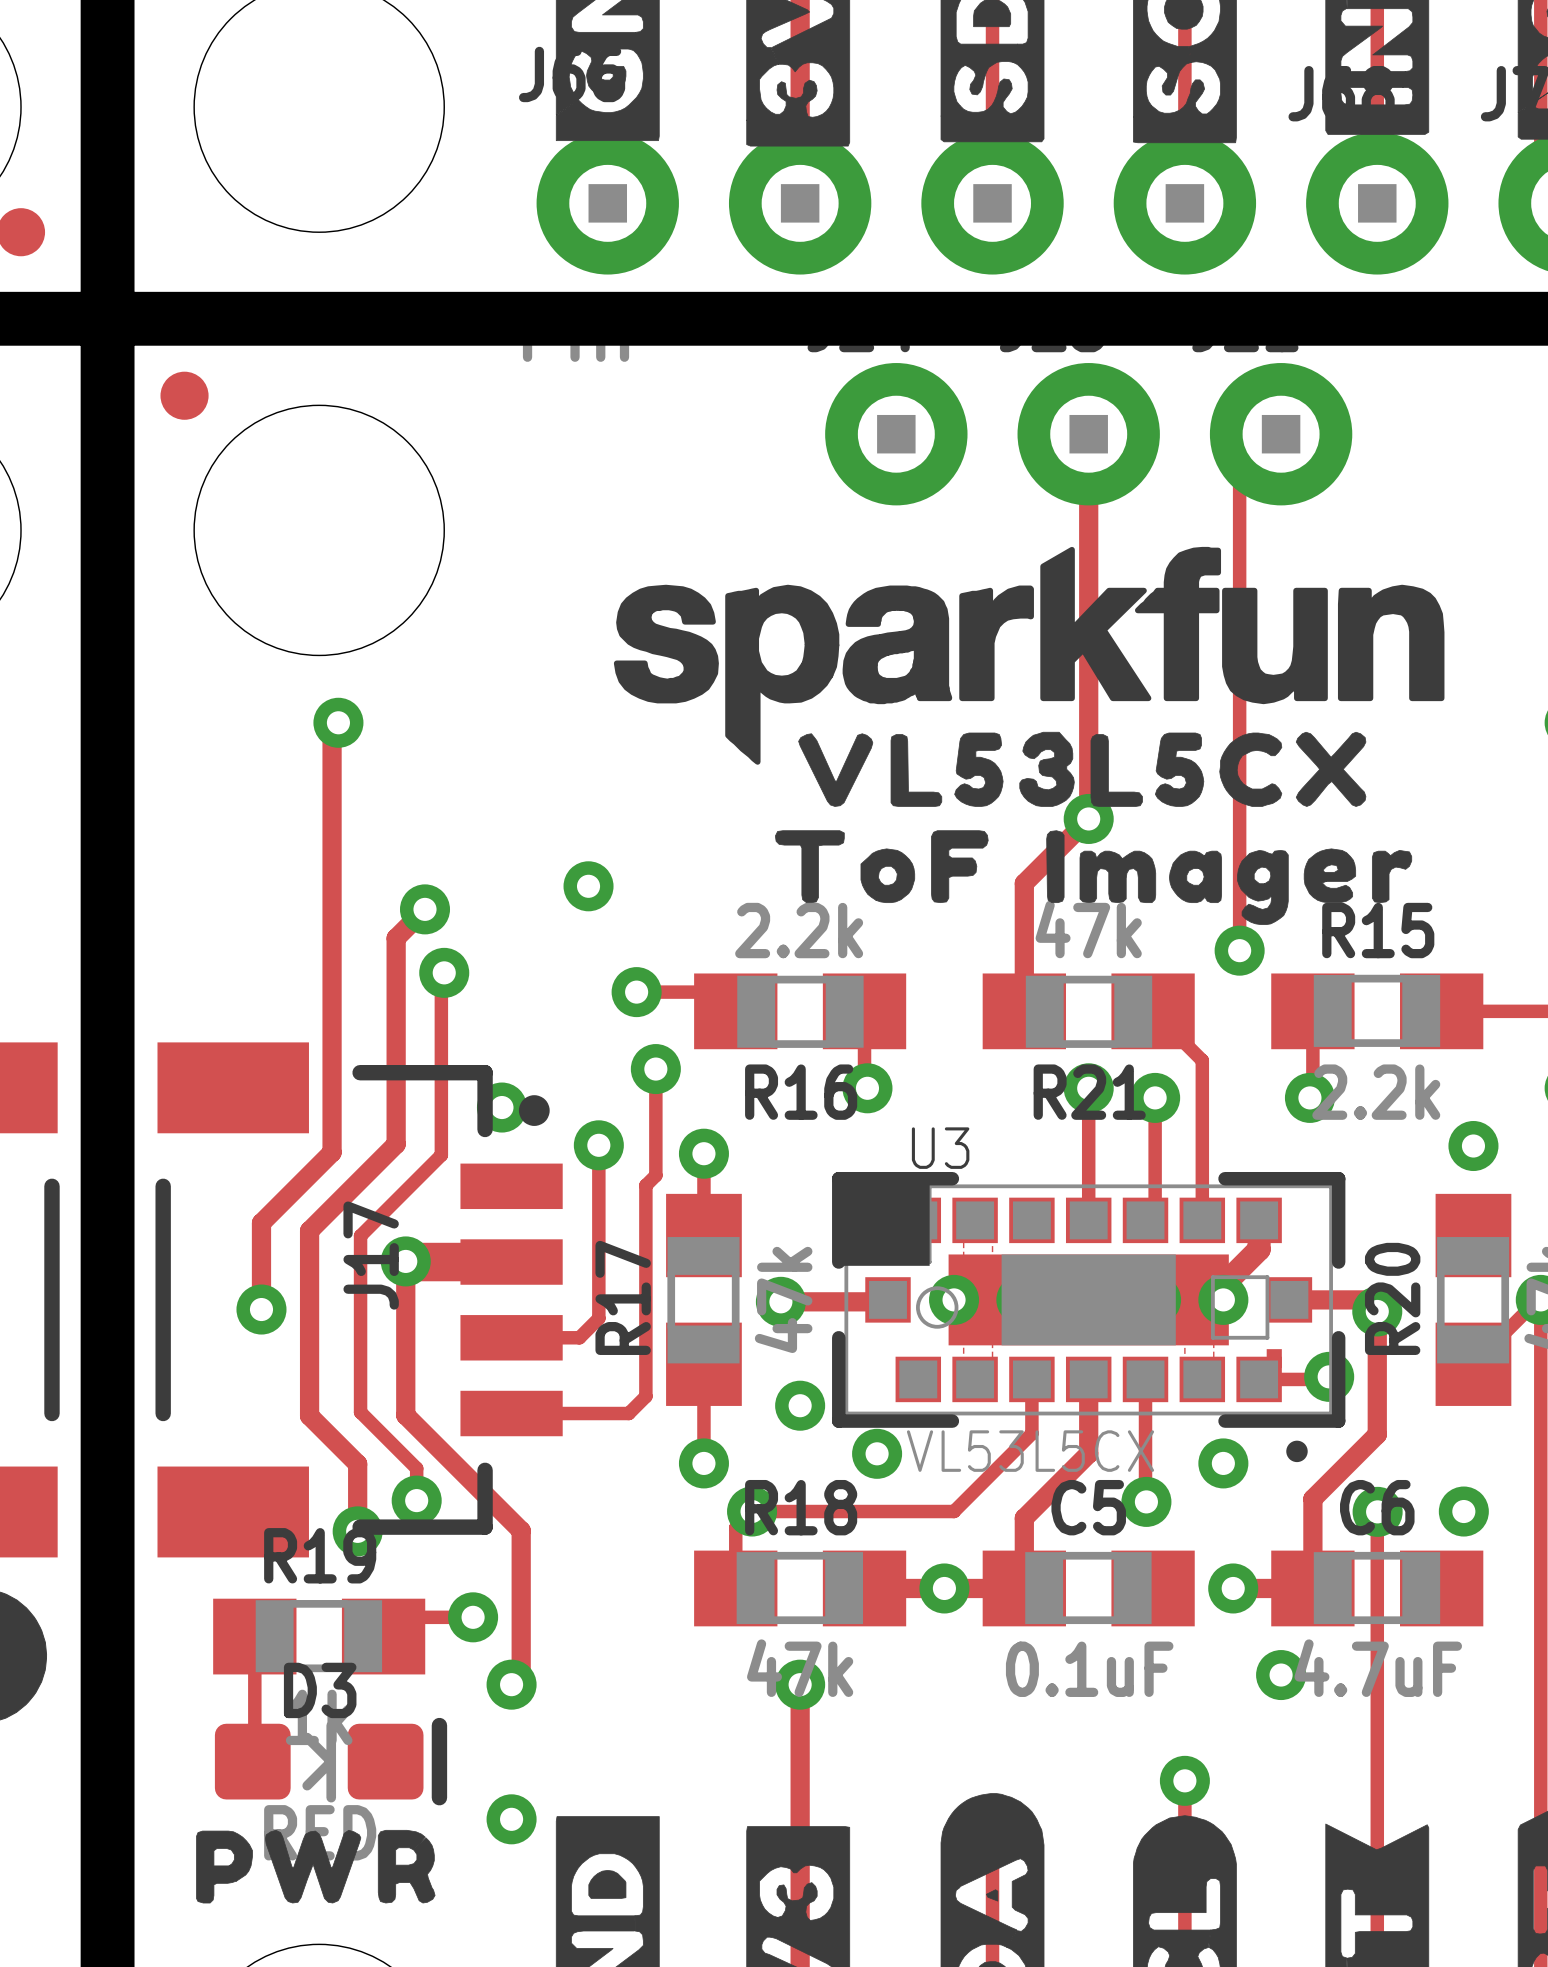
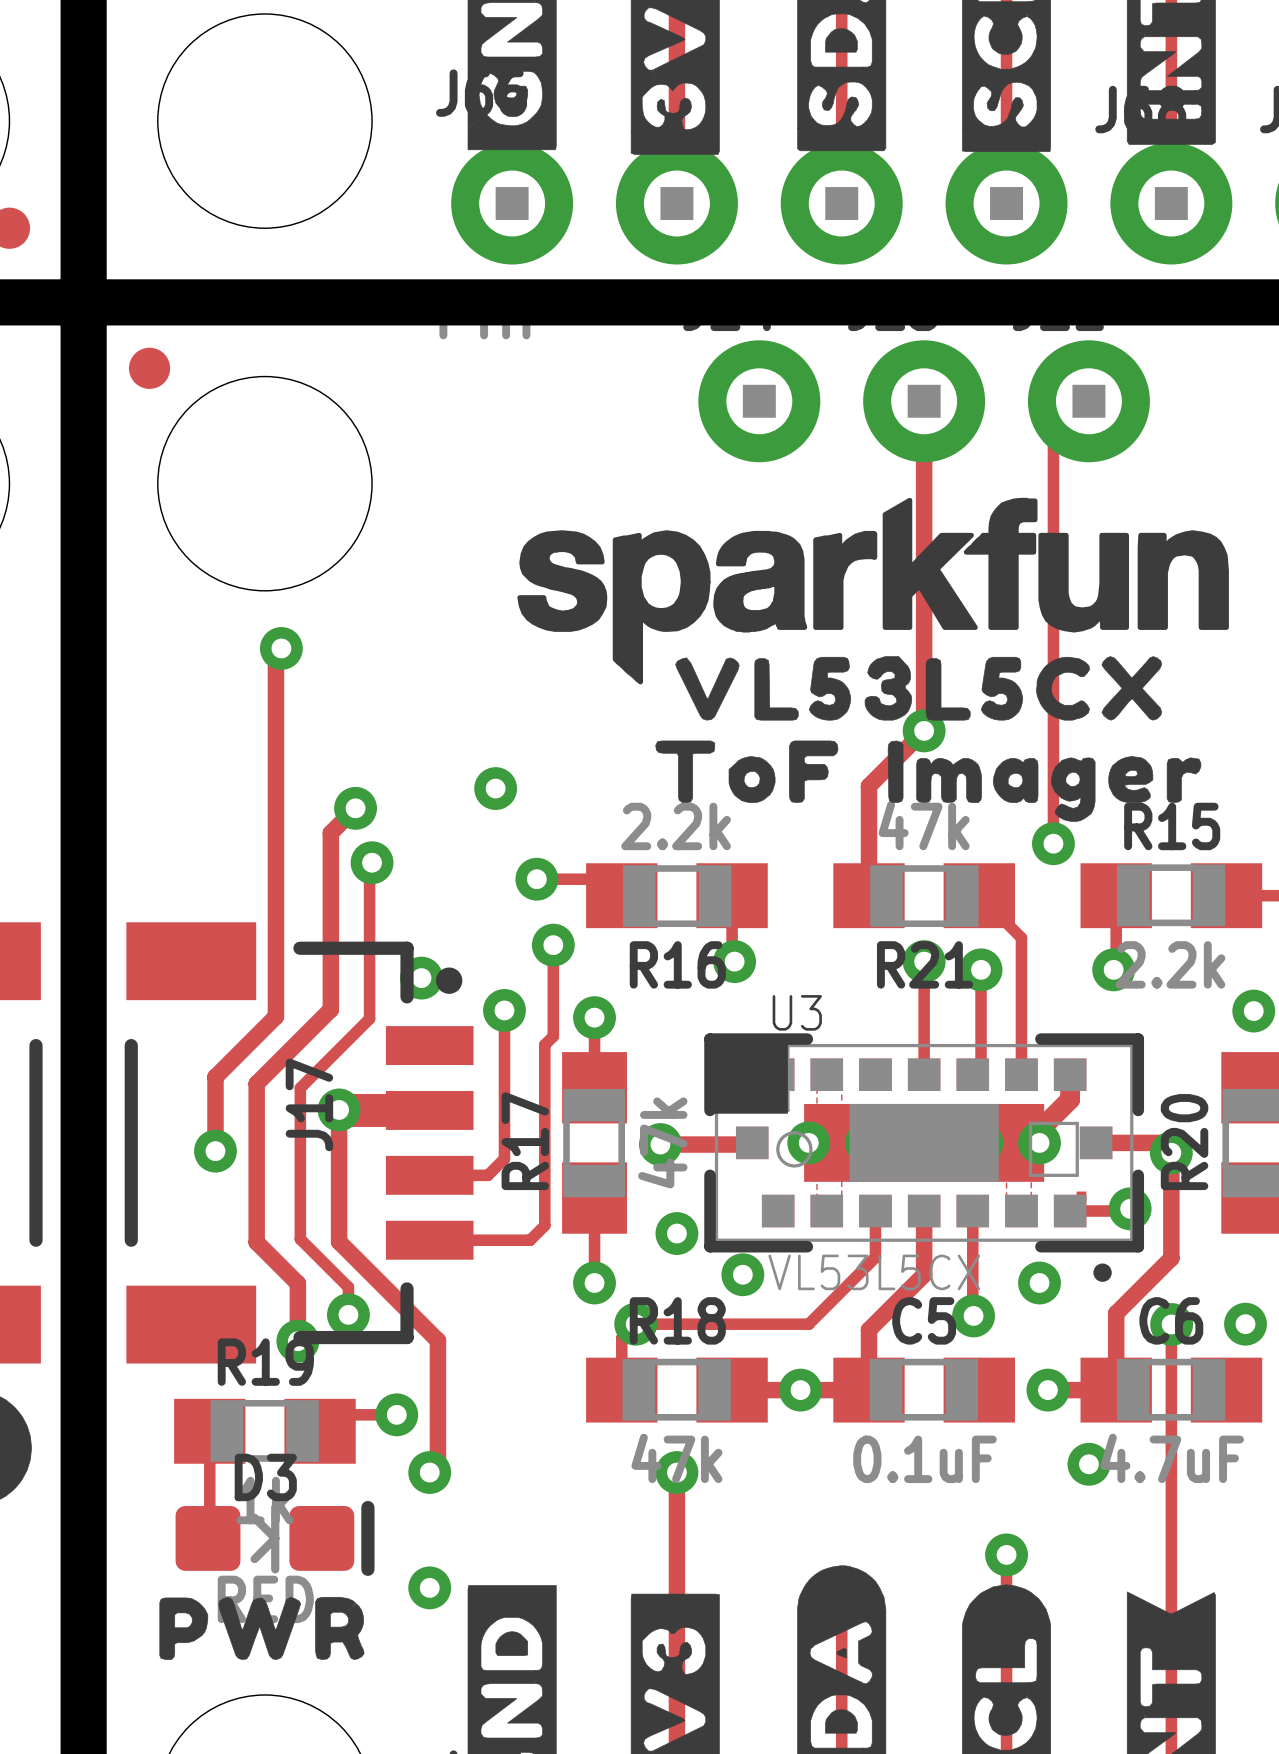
U3 footprint: [832, 1171, 1346, 1463] -> [704, 1033, 1145, 1282]

